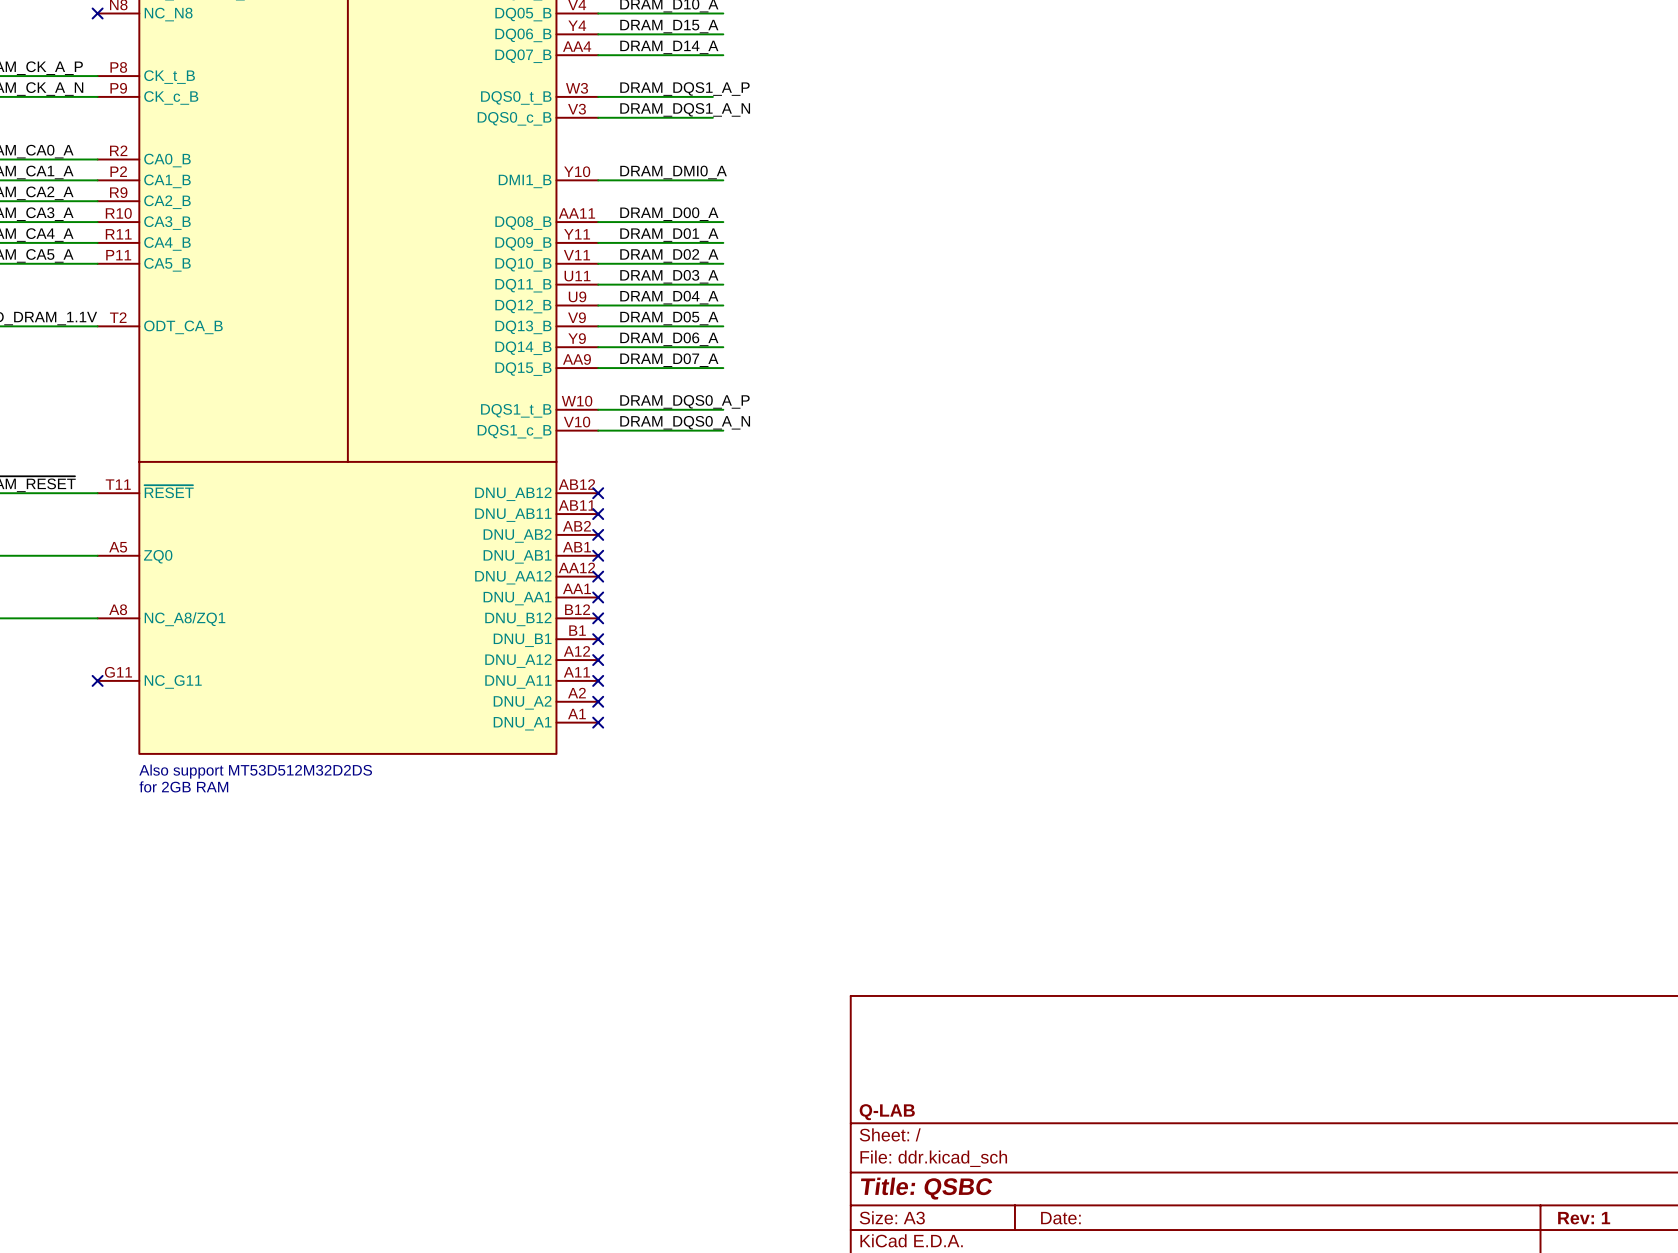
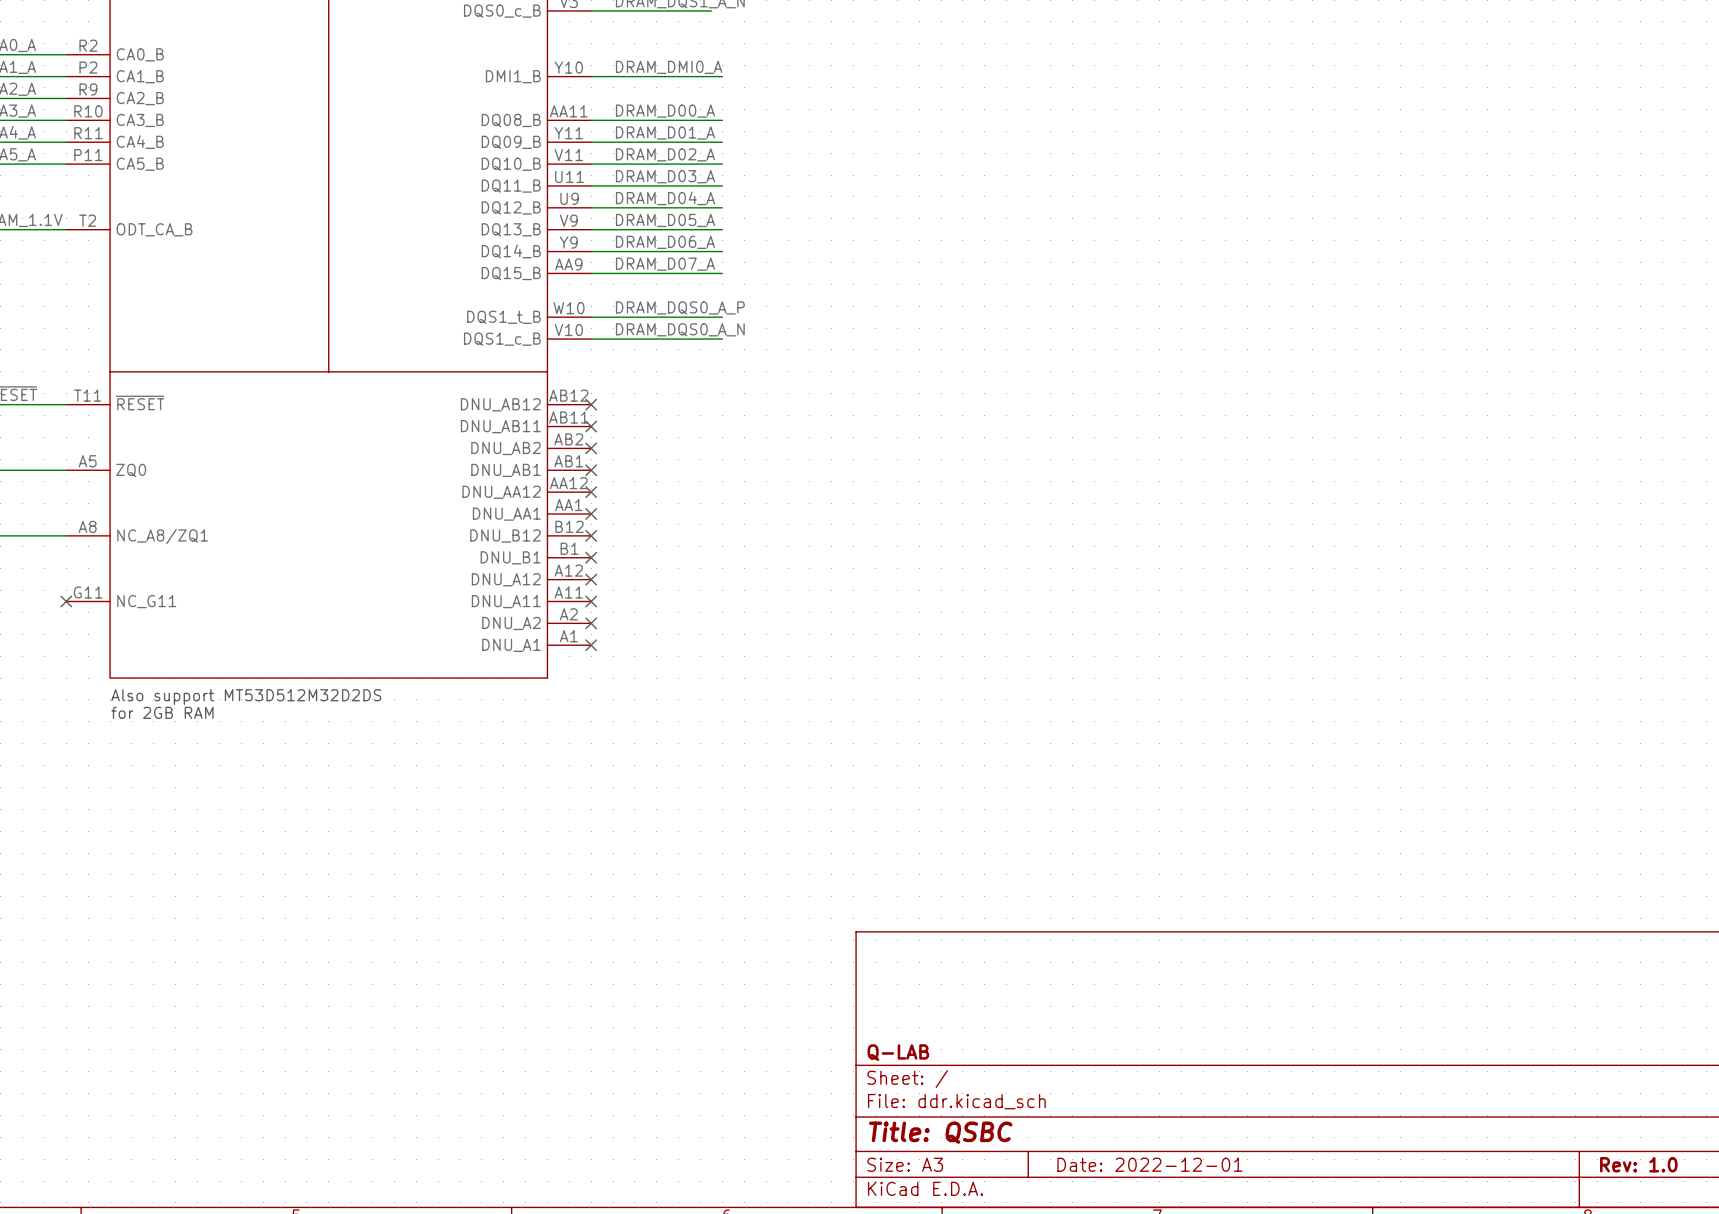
title block: Date: (1060, 1218) -> Date: 2022-12-01 (1149, 1164)
title block: Rev: 1 (1584, 1218) -> Rev: 1.0 (1638, 1164)

